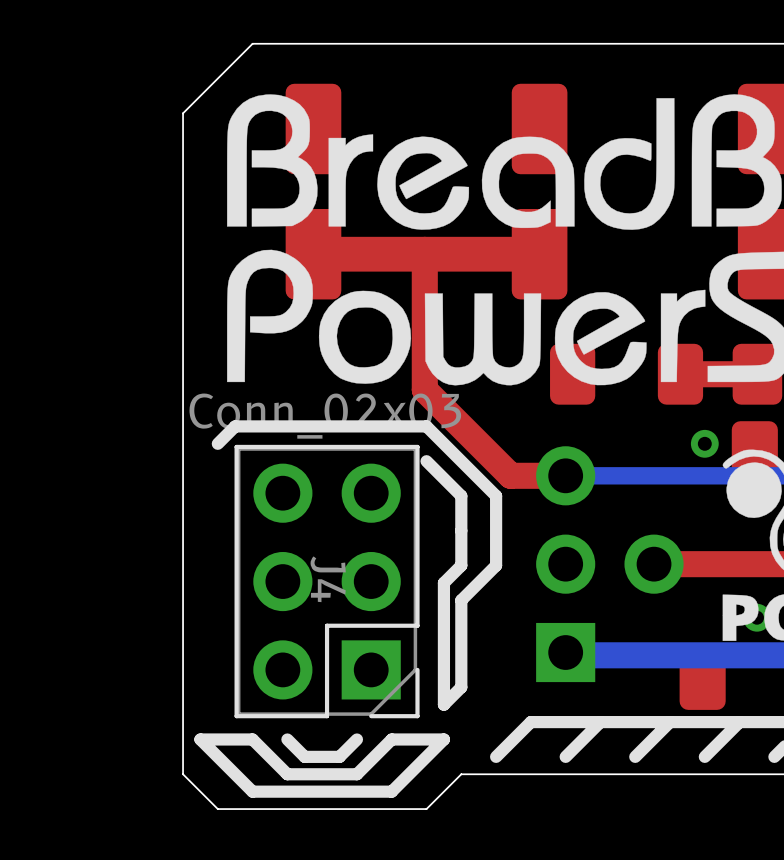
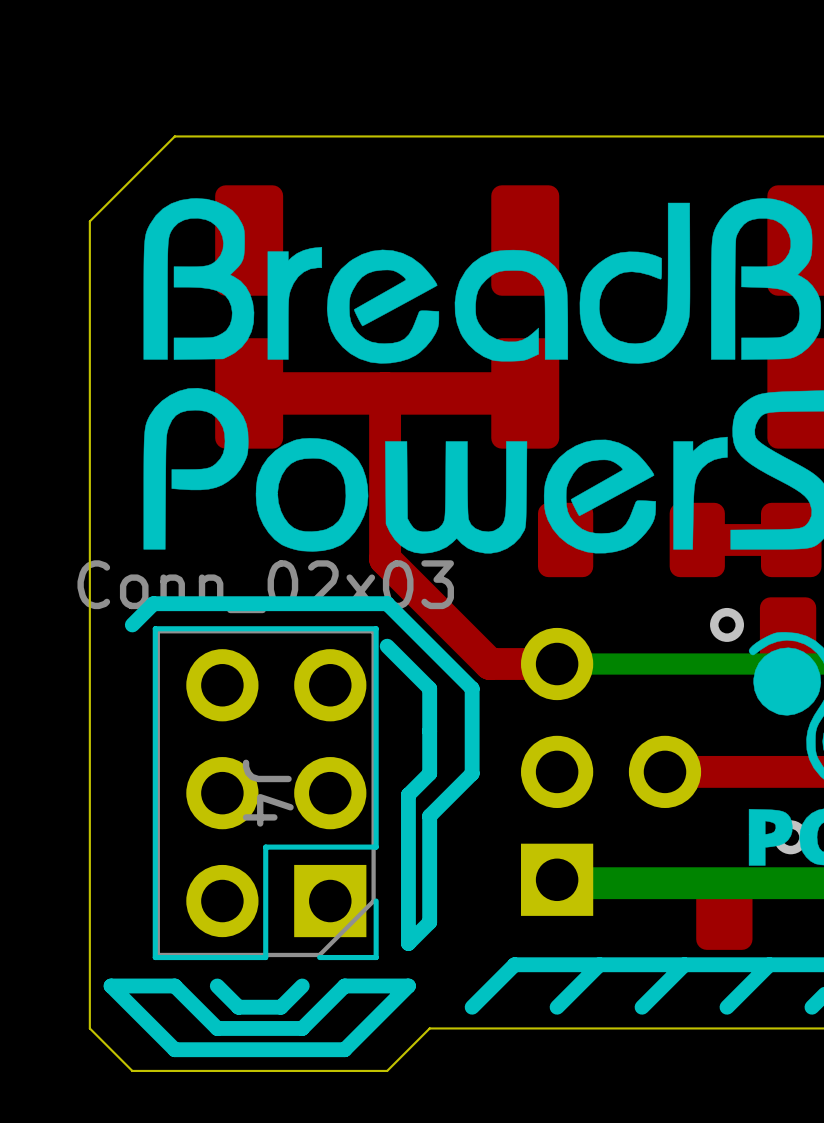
J4 footprint: [234, 444, 420, 719] -> [152, 626, 379, 961]

